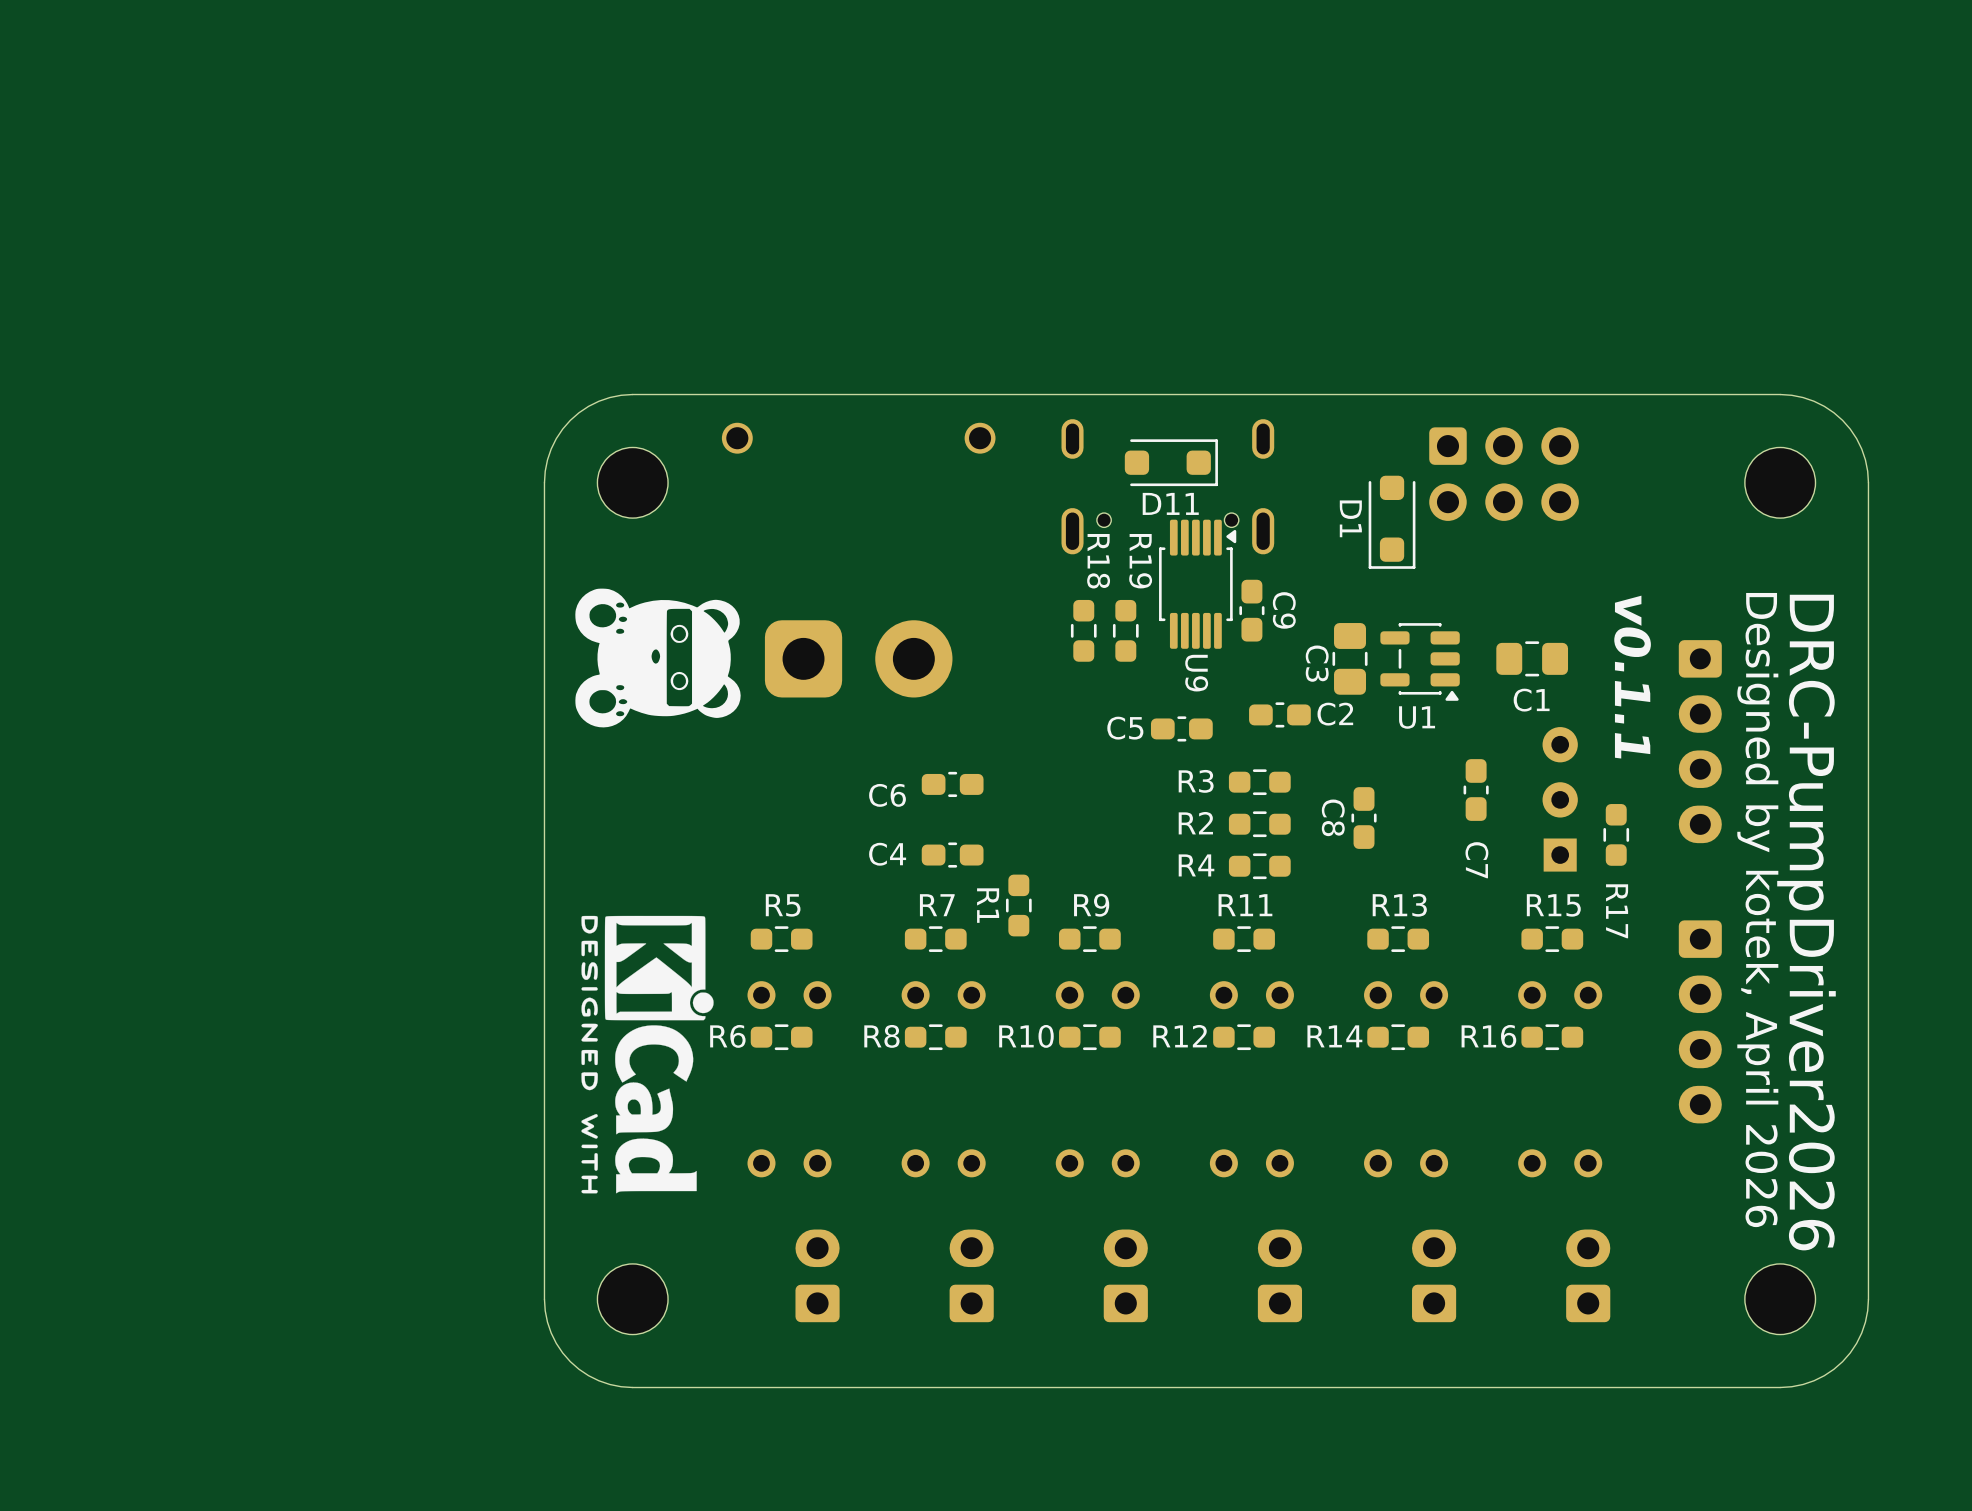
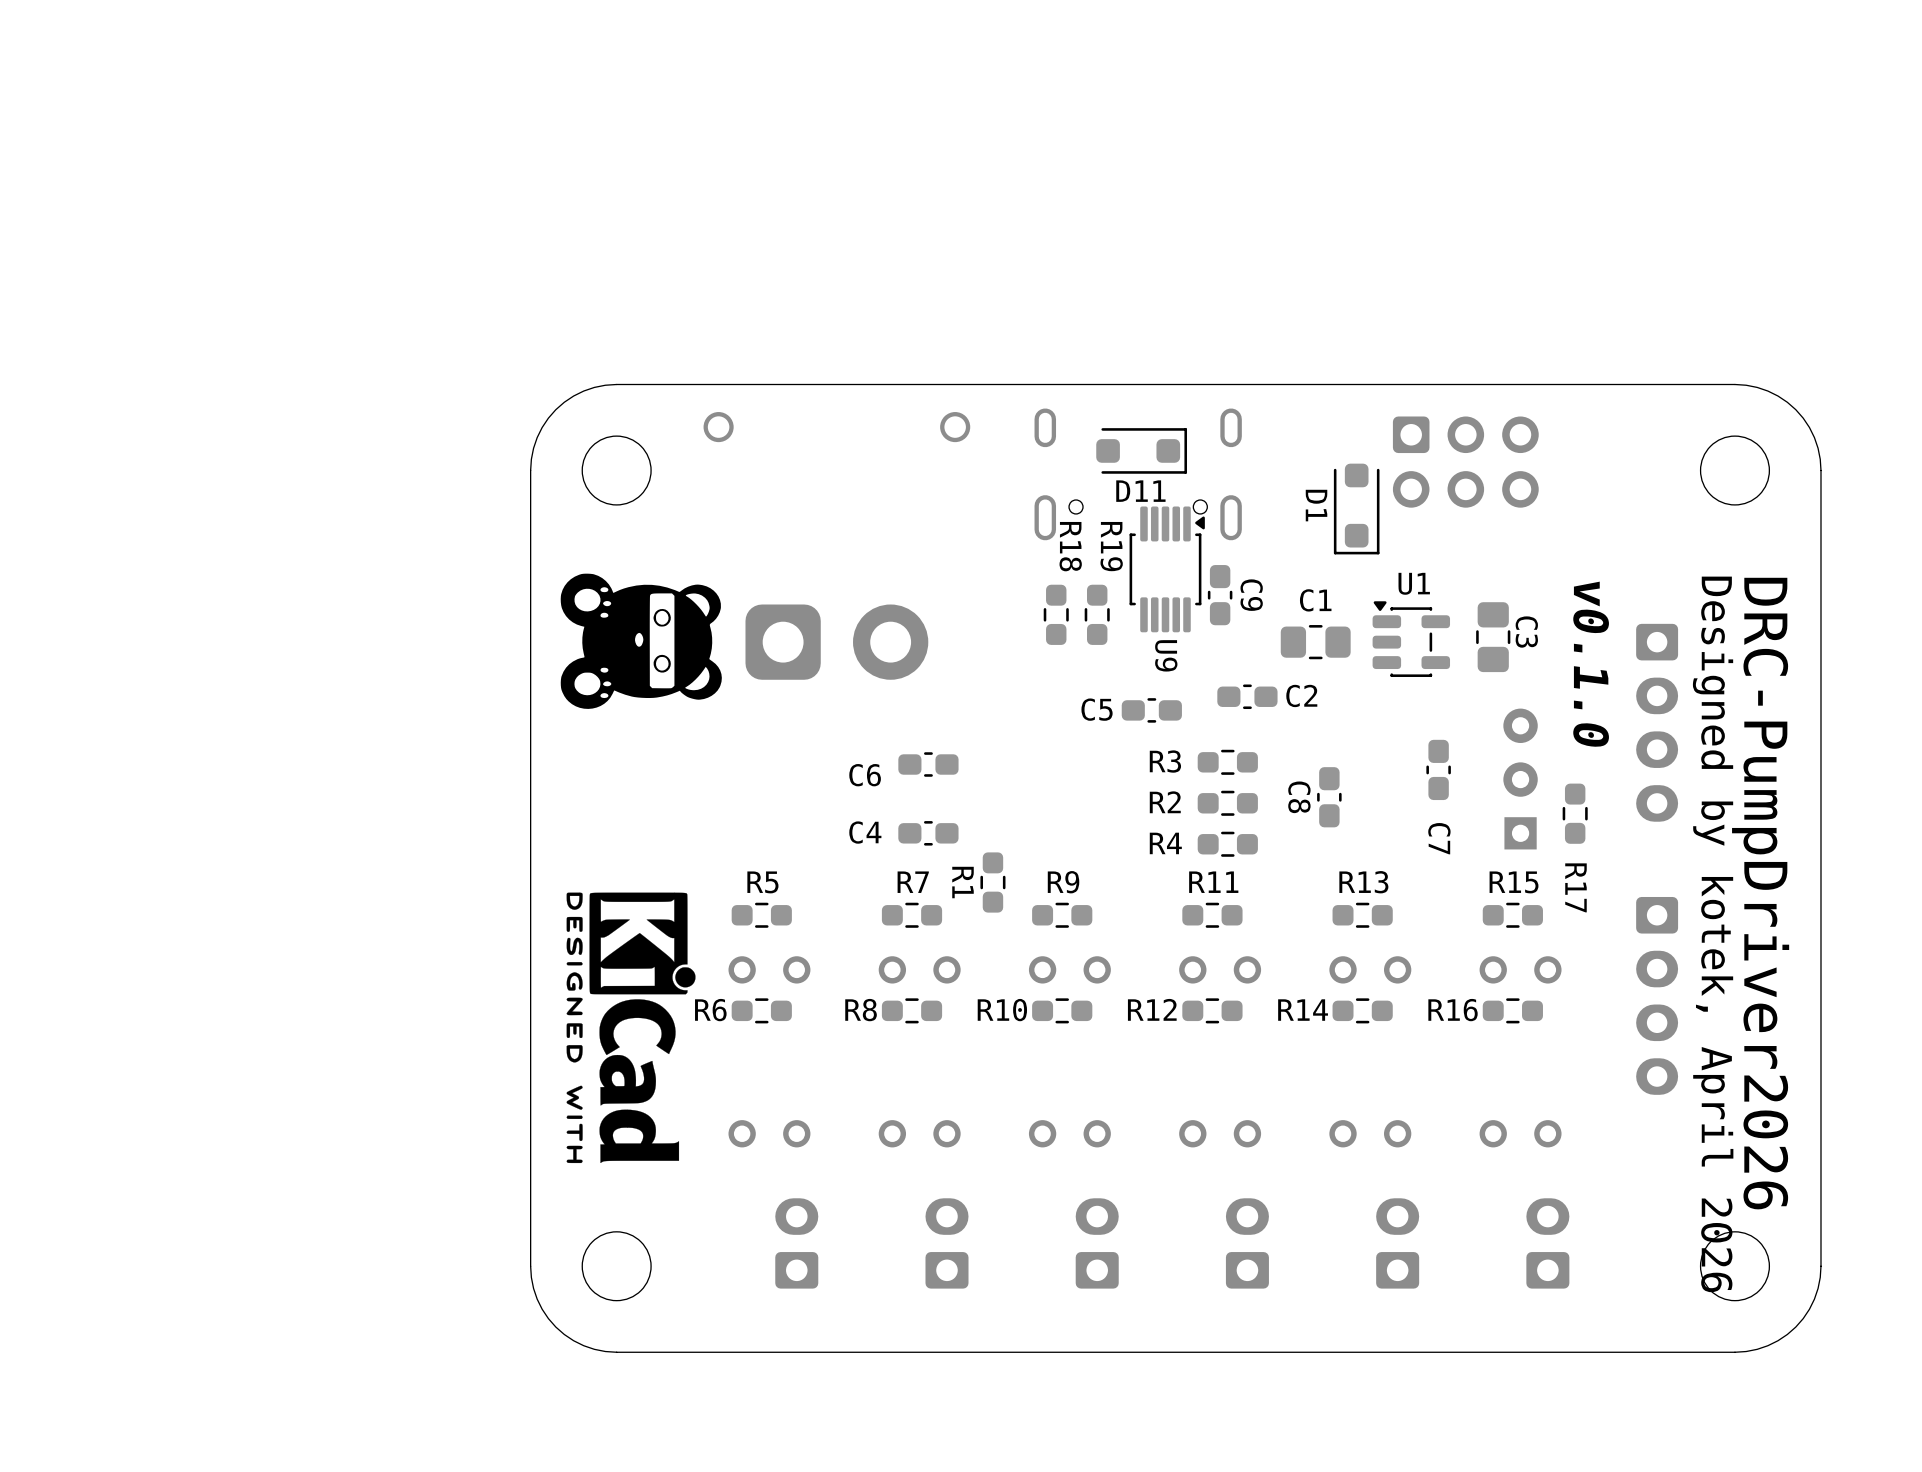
C3 position: (1350, 658) -> (1493, 637)
C1 position: (1532, 658) -> (1315, 642)
U1 rotation: 0° (1420, 661) -> 180° (1411, 639)
C3 name position: C3 (1317, 663) -> C3 (1526, 632)
text: v0.1.1 (1632, 677) -> v0.1.0 (1591, 664)
C1 name position: C1 (1531, 700) -> C1 (1315, 600)

